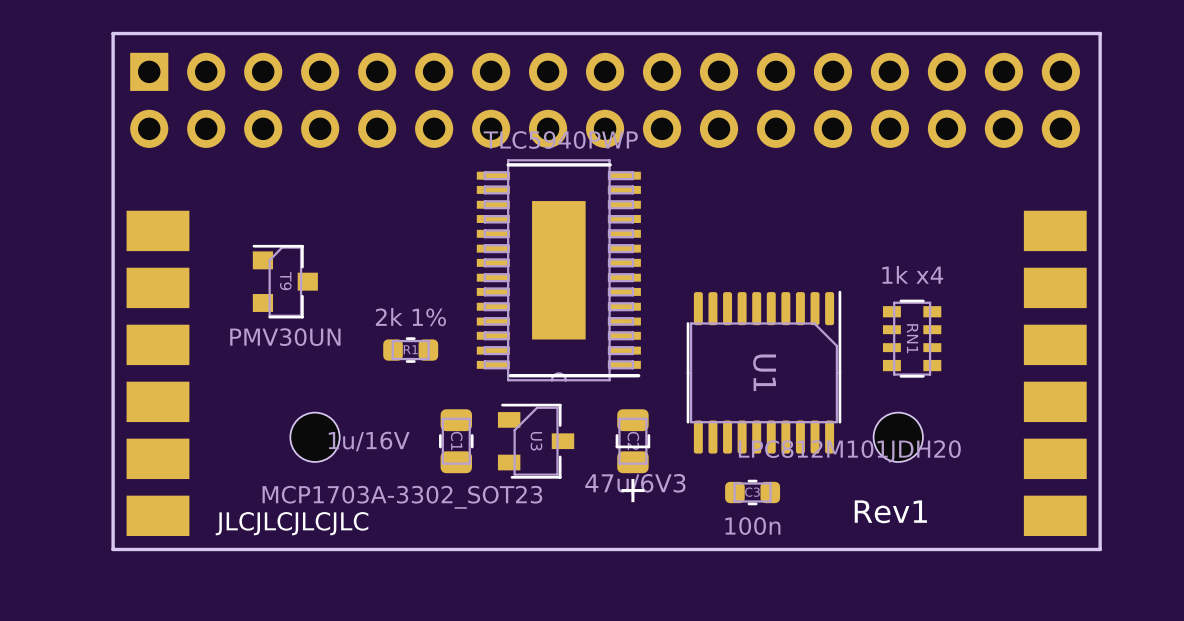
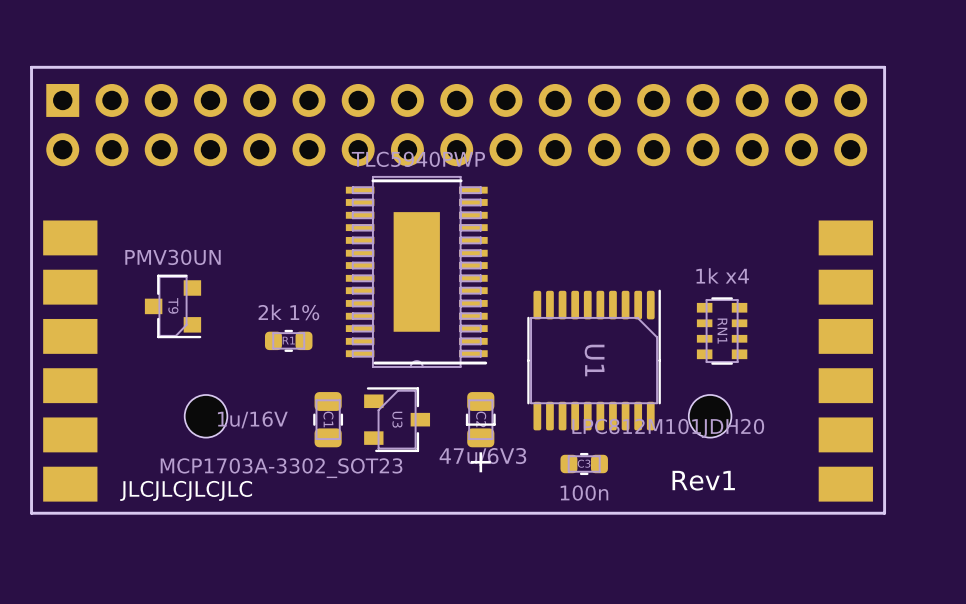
T9 rotation: 0° (285, 281) -> 180° (173, 306)

